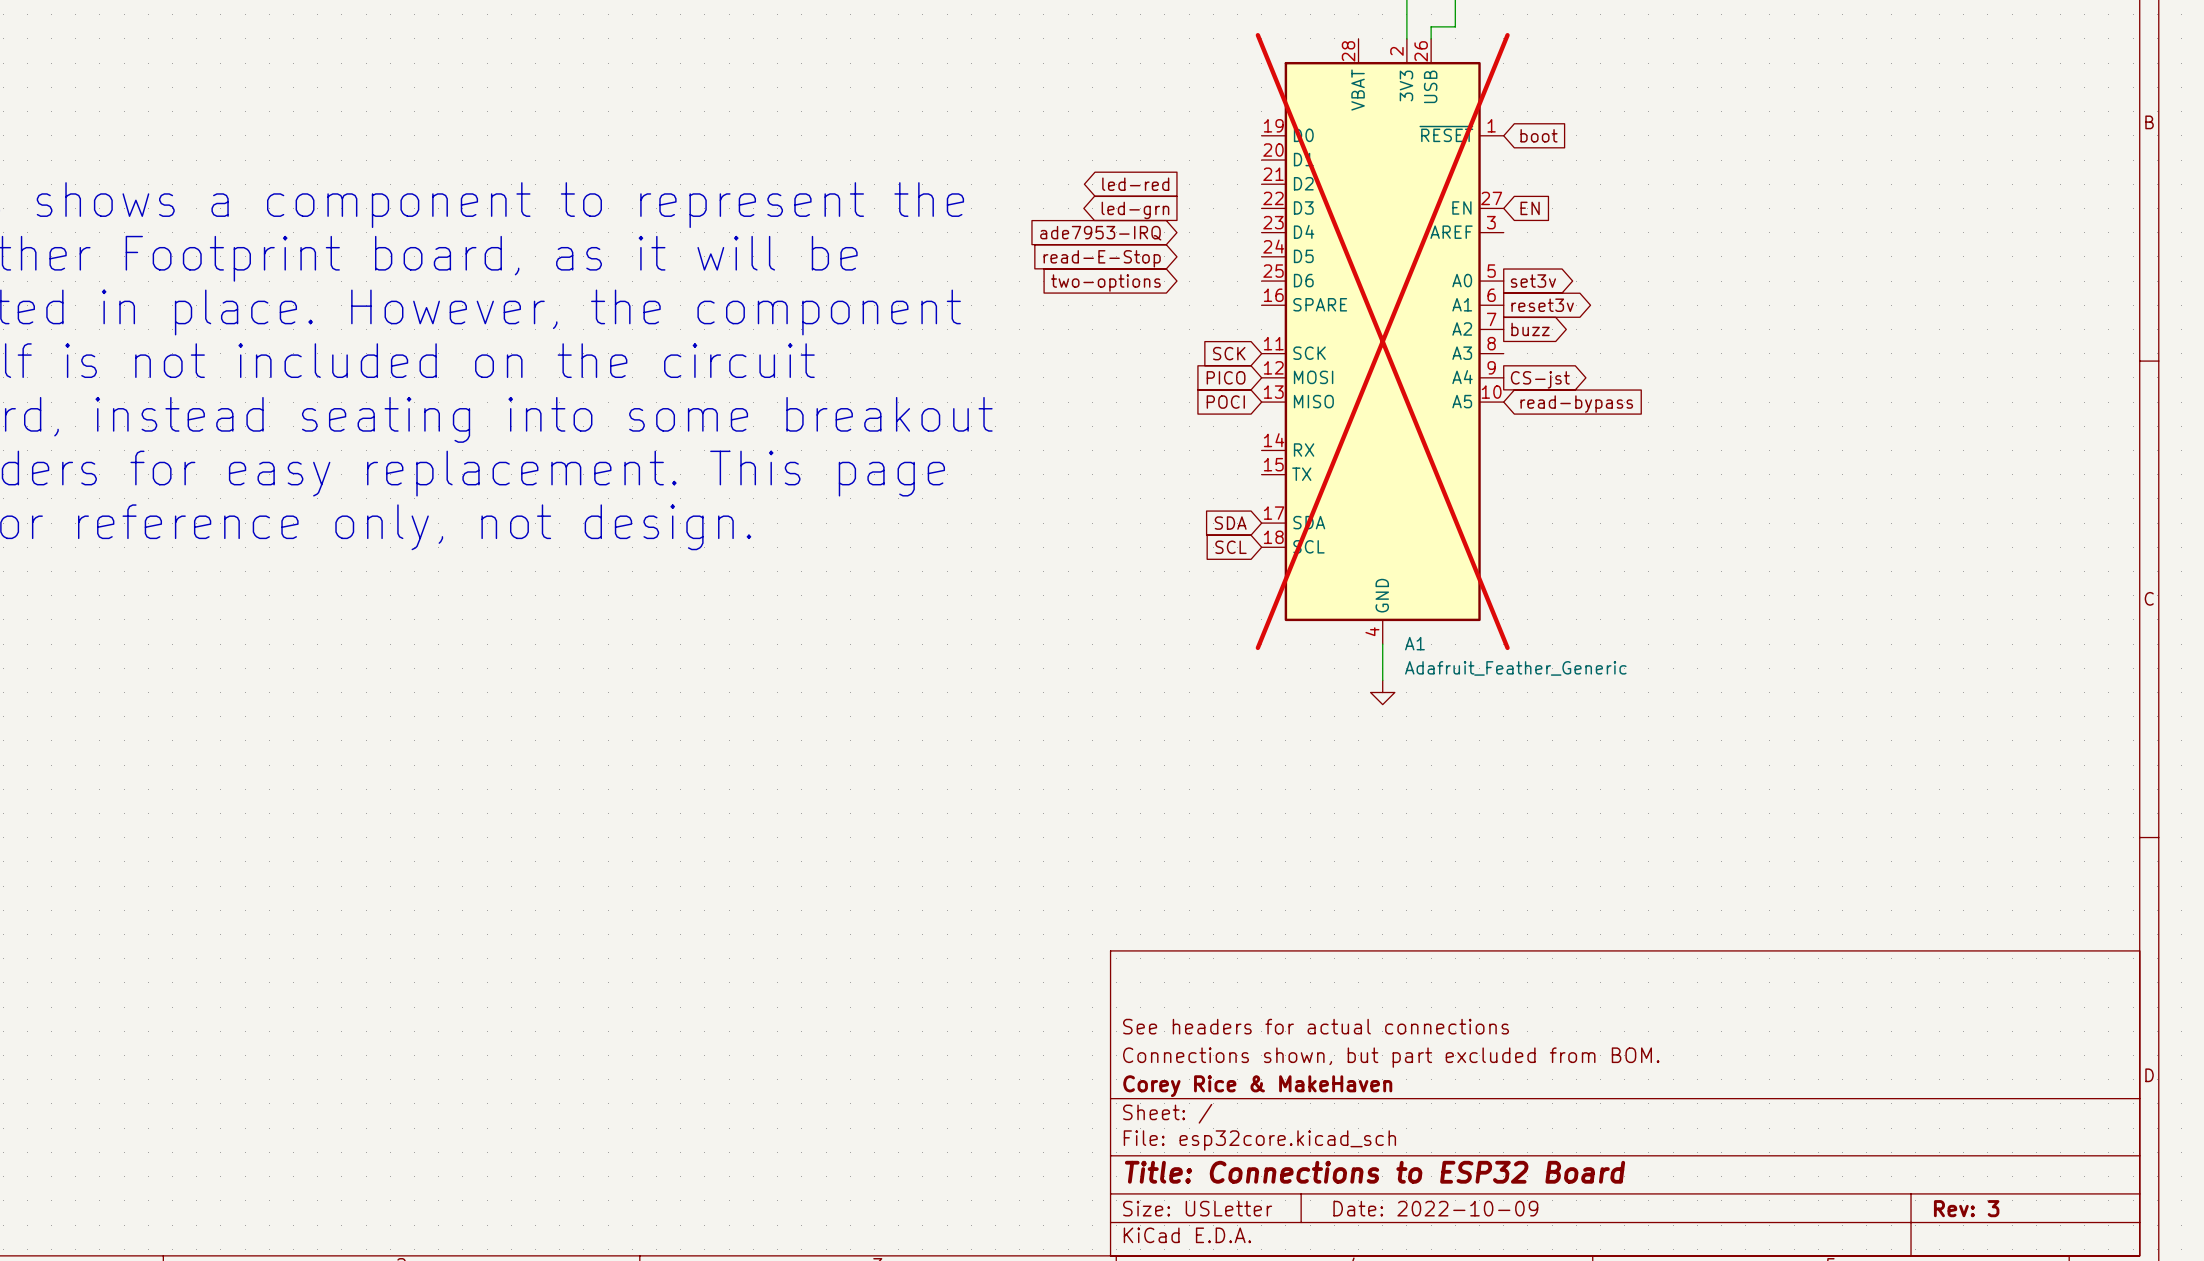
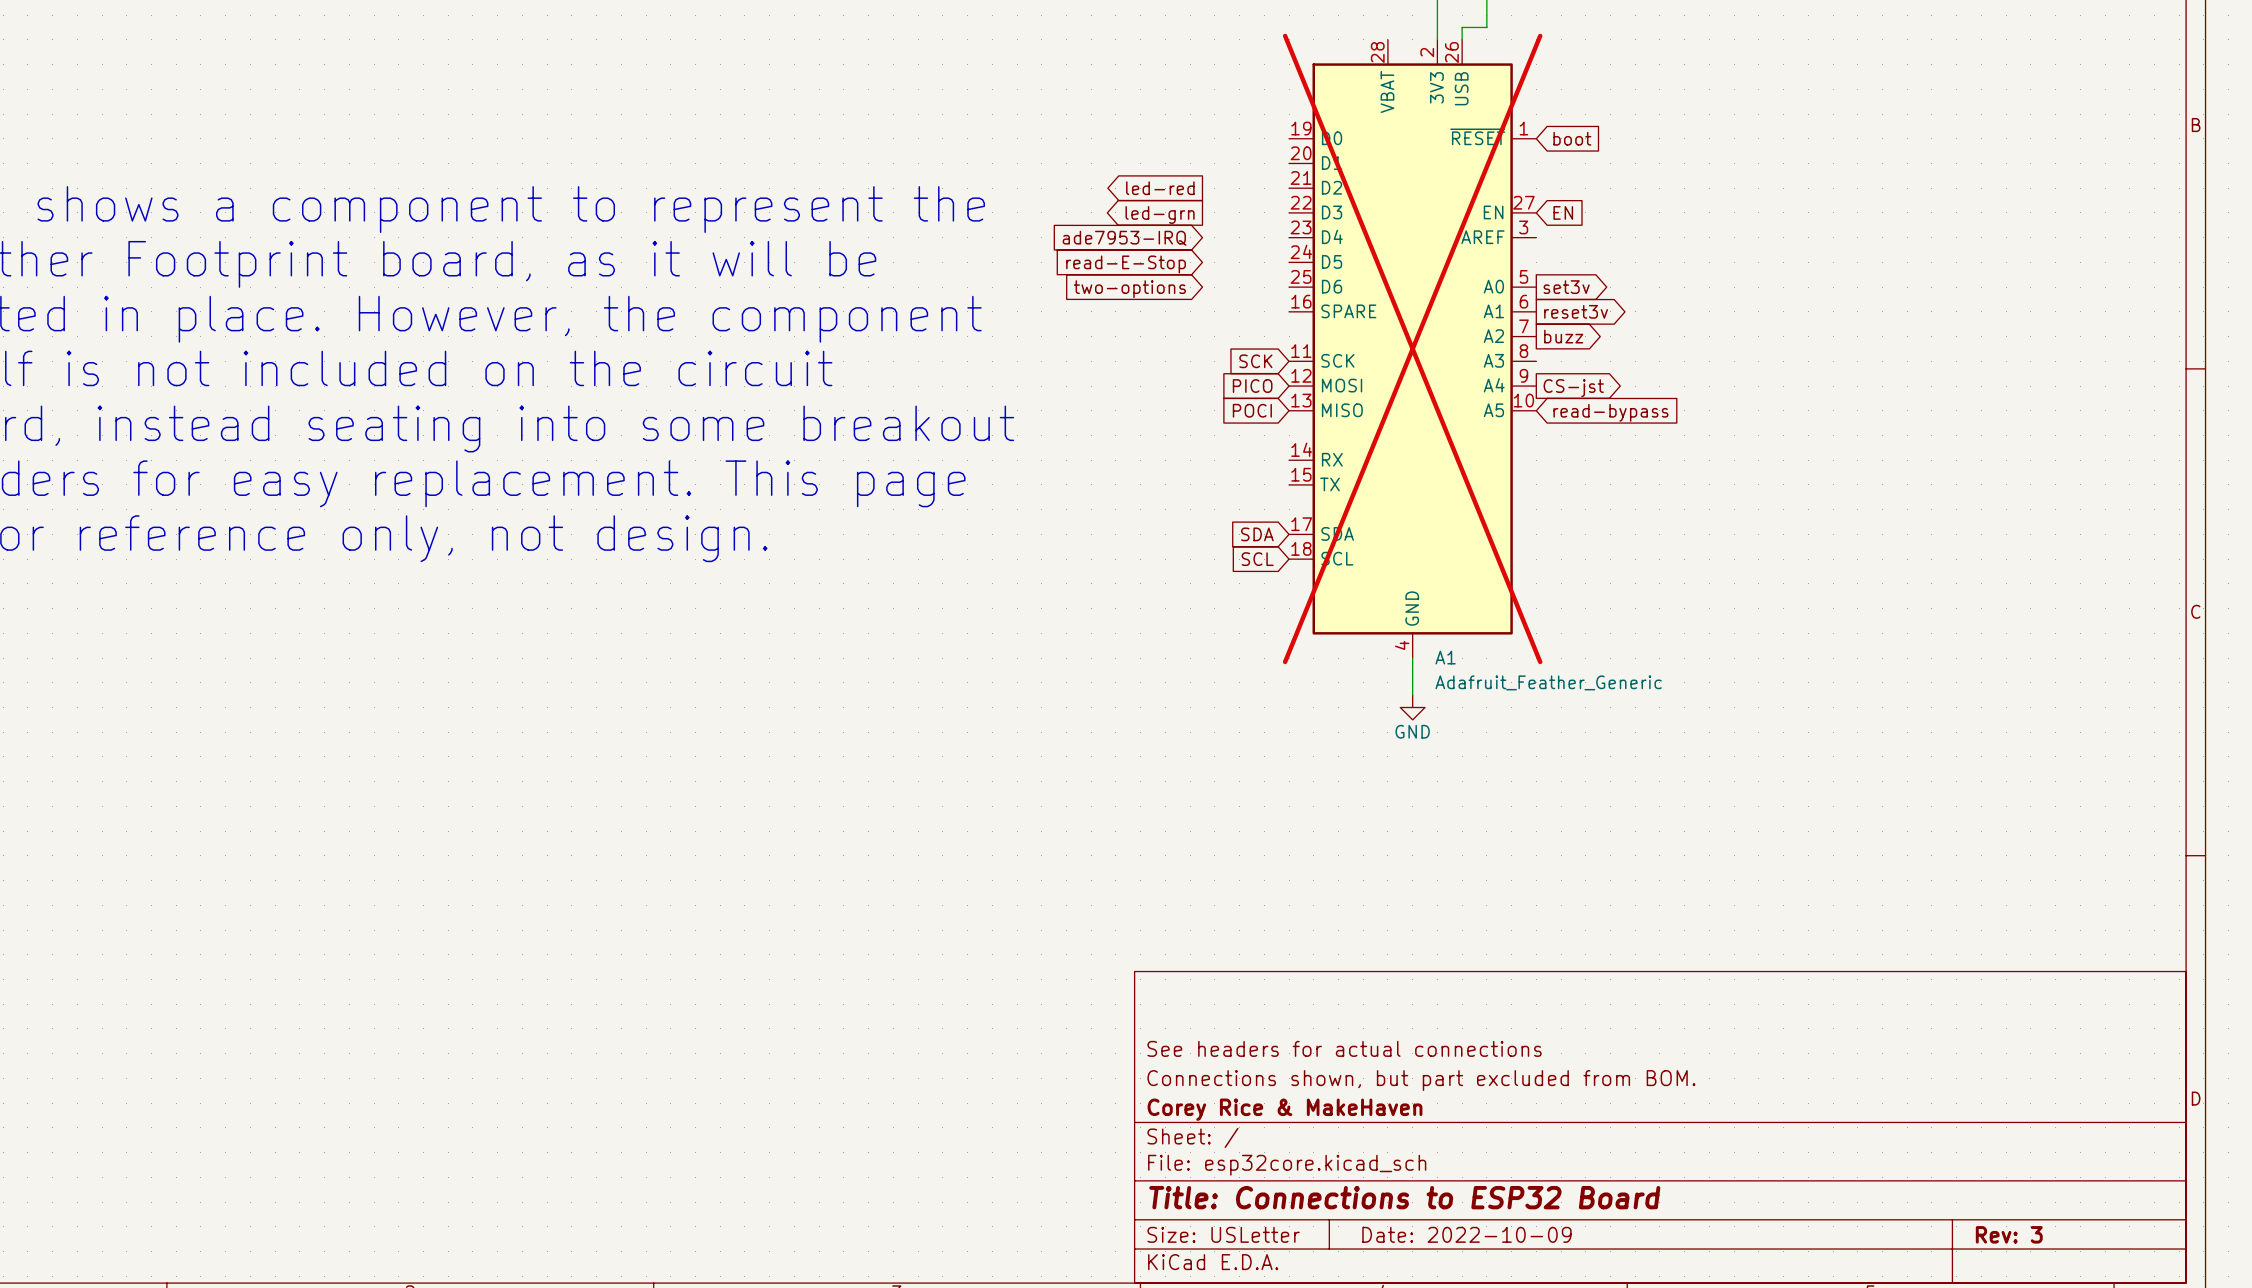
power symbol text: none -> GND (1412, 731)

